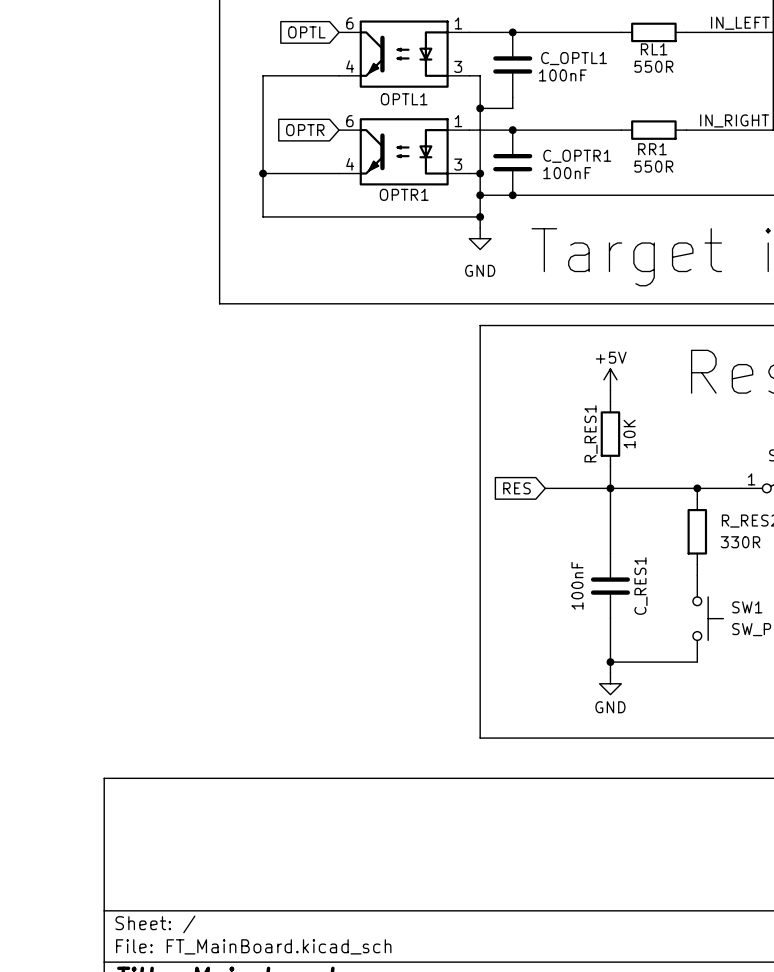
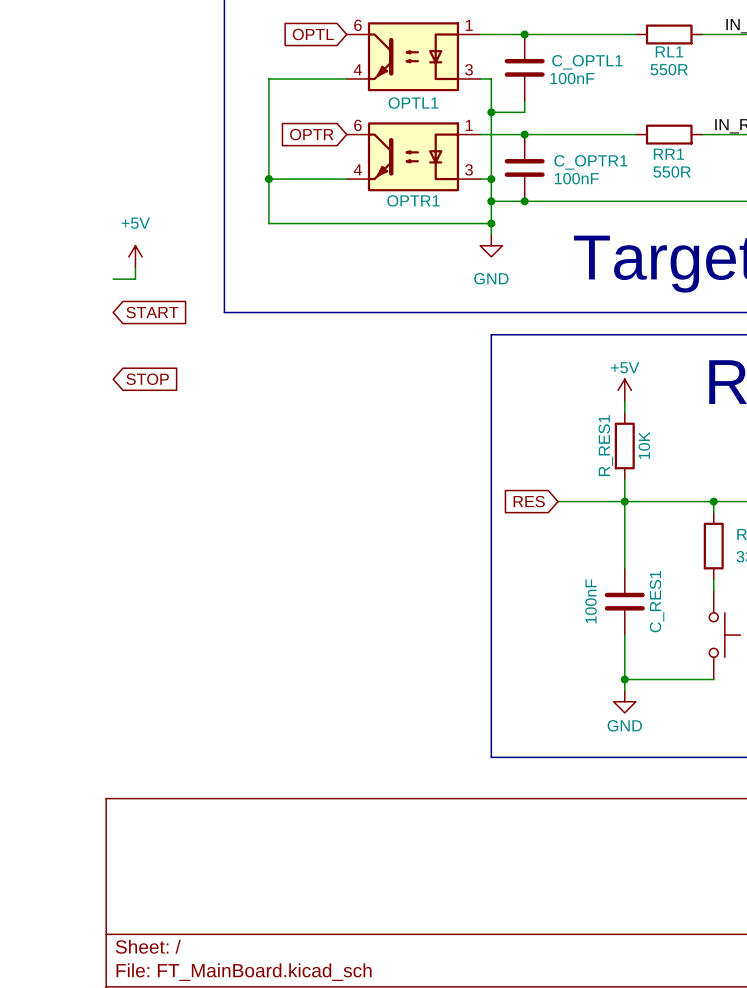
power symbol: none -> +5V (135, 256)
wire: none -> (135, 268) (135, 279) (113, 279)
global label: none -> START (152, 312)
global label: none -> STOP (147, 379)

